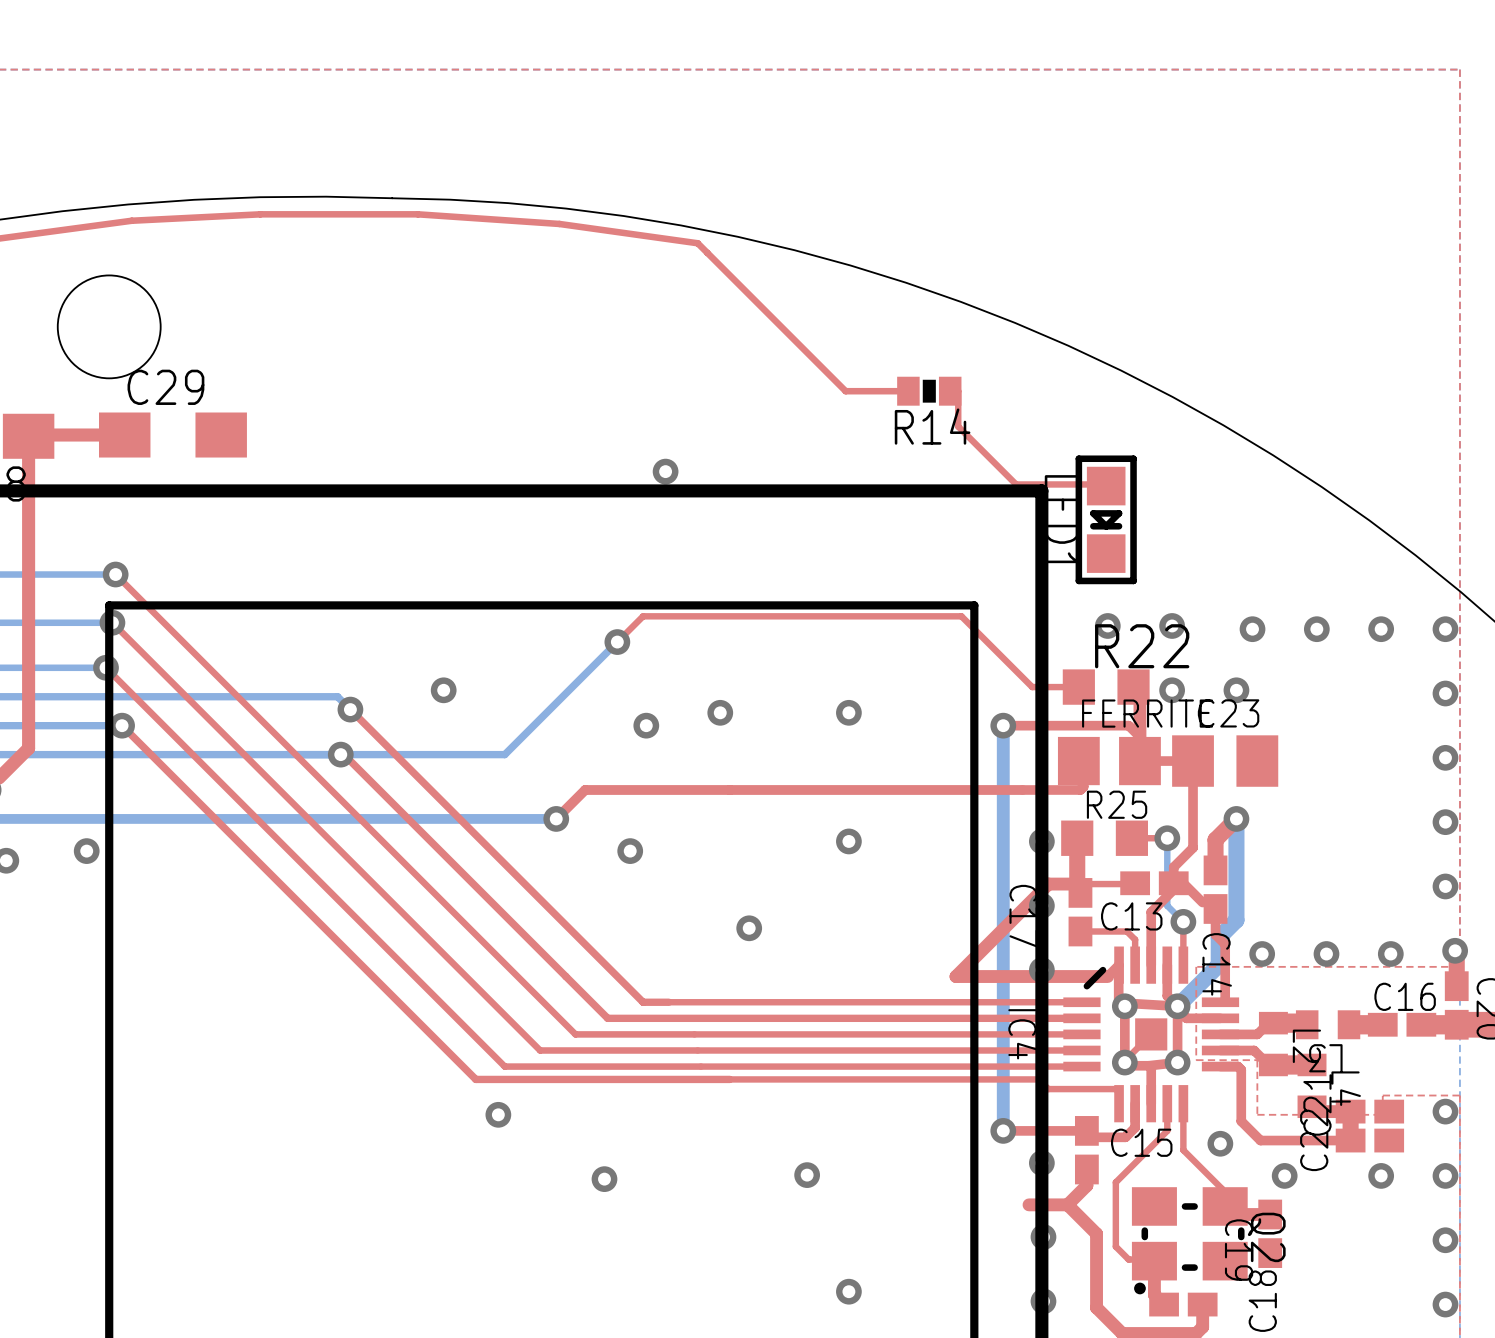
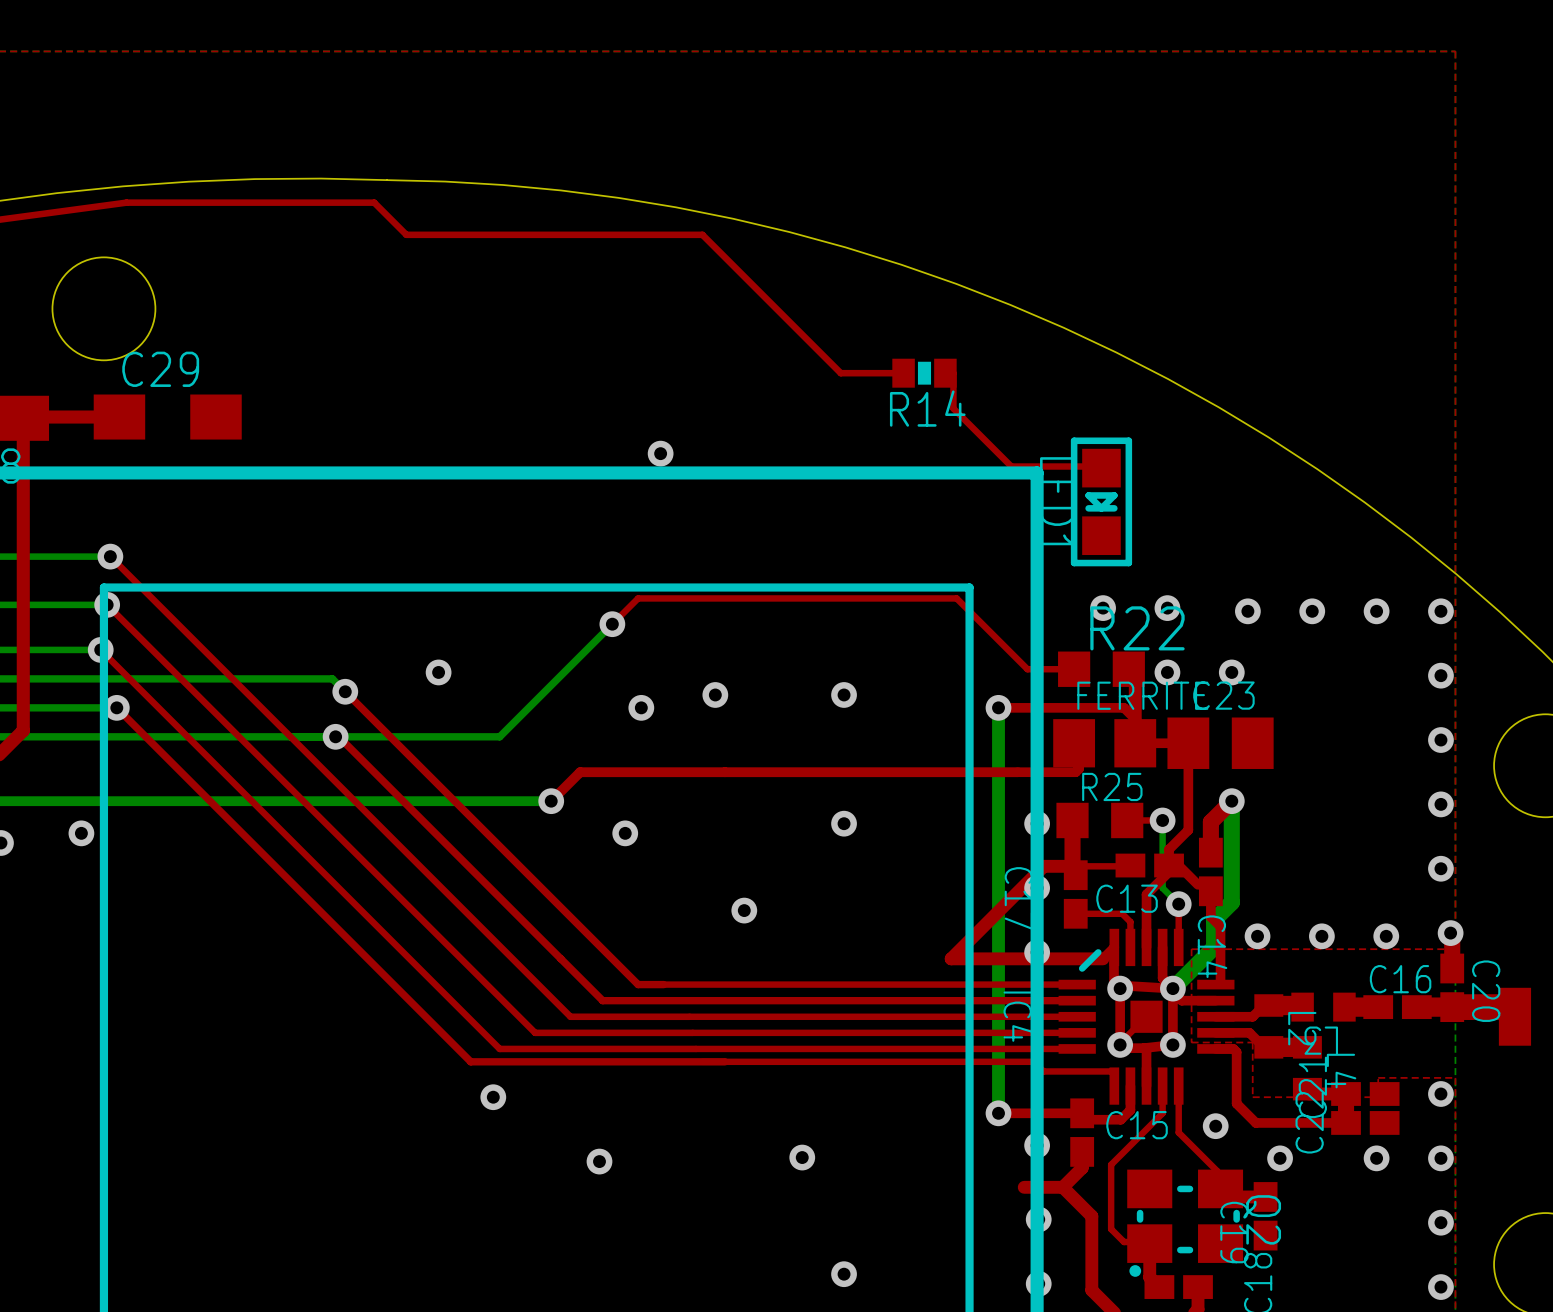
top track: (131, 220) (260, 214) (417, 214) (559, 223) (697, 243) (707, 252) -> (126, 202) (374, 202) (406, 234) (702, 234)

